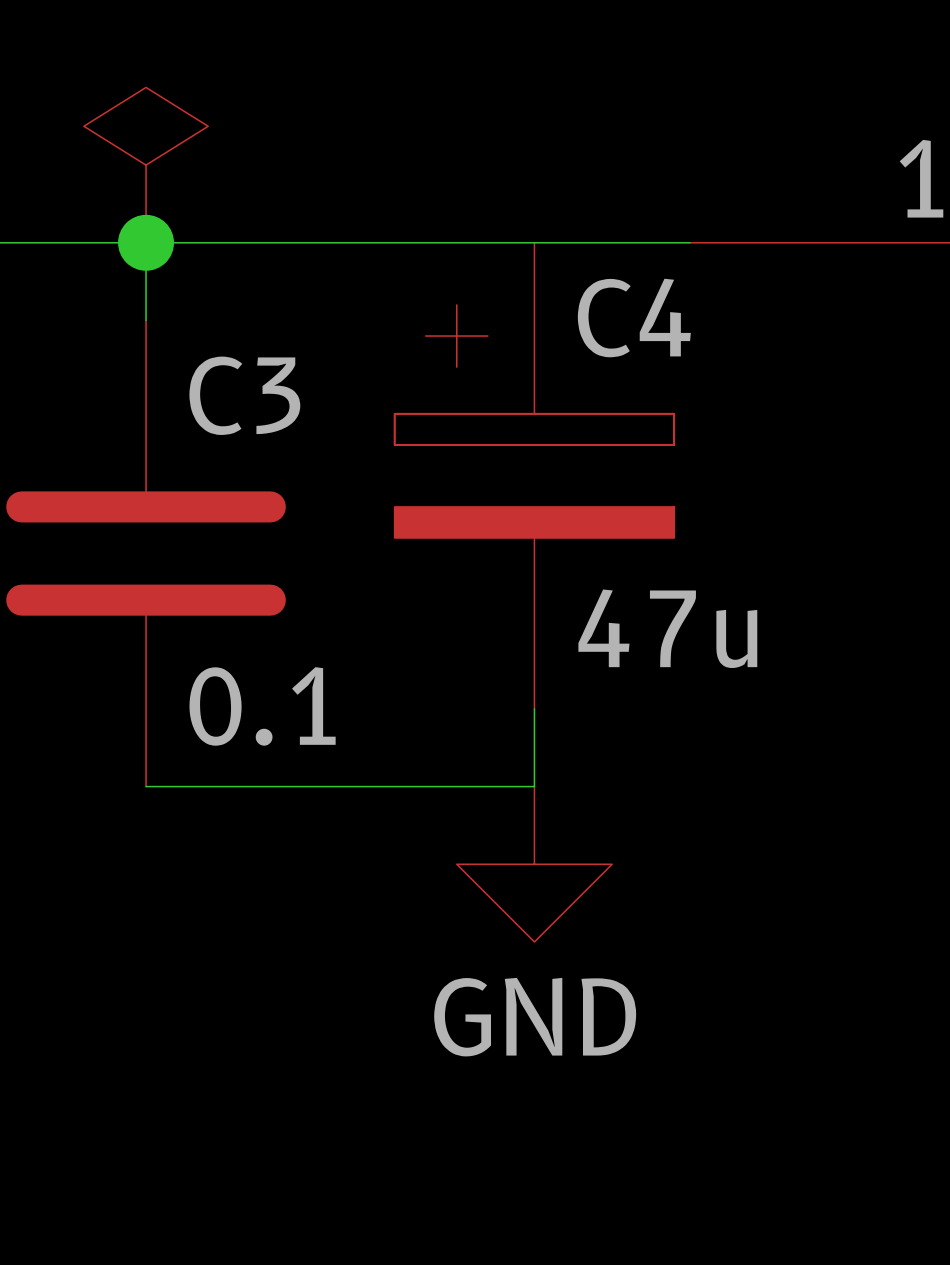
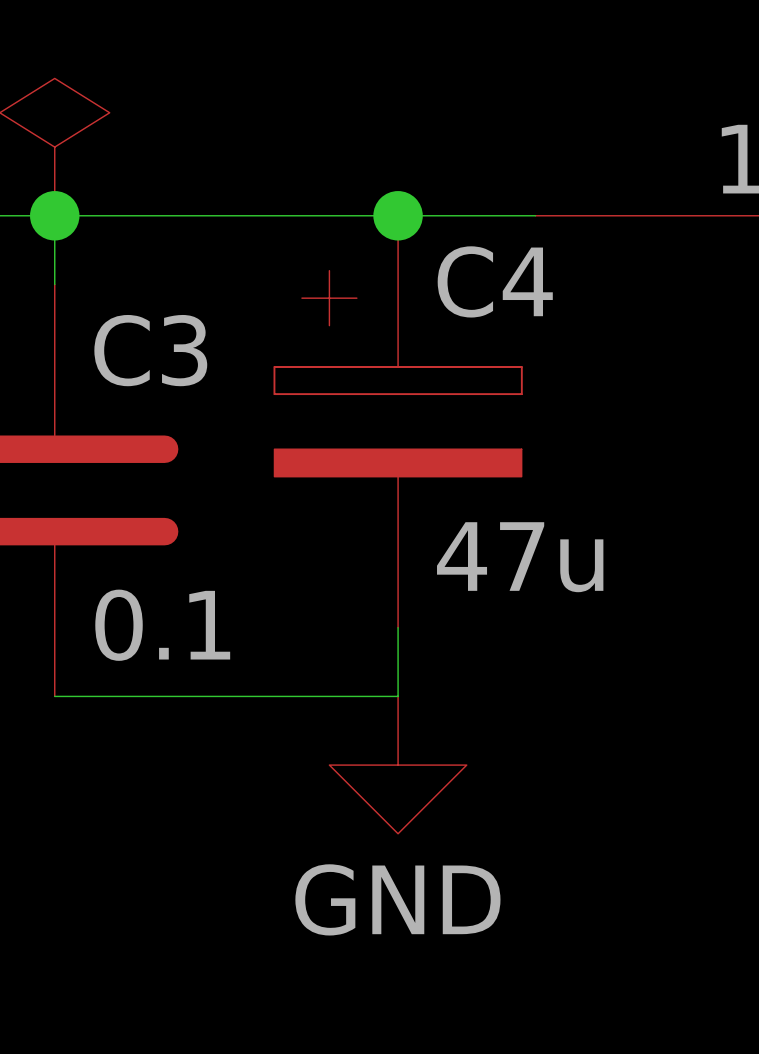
junction: none -> (398, 215)

